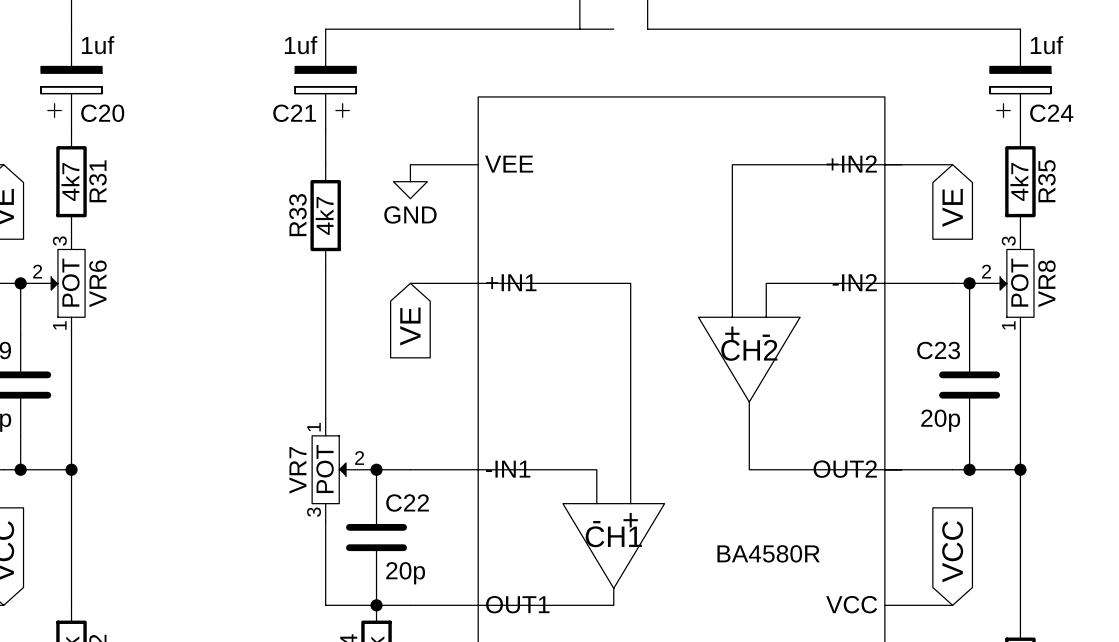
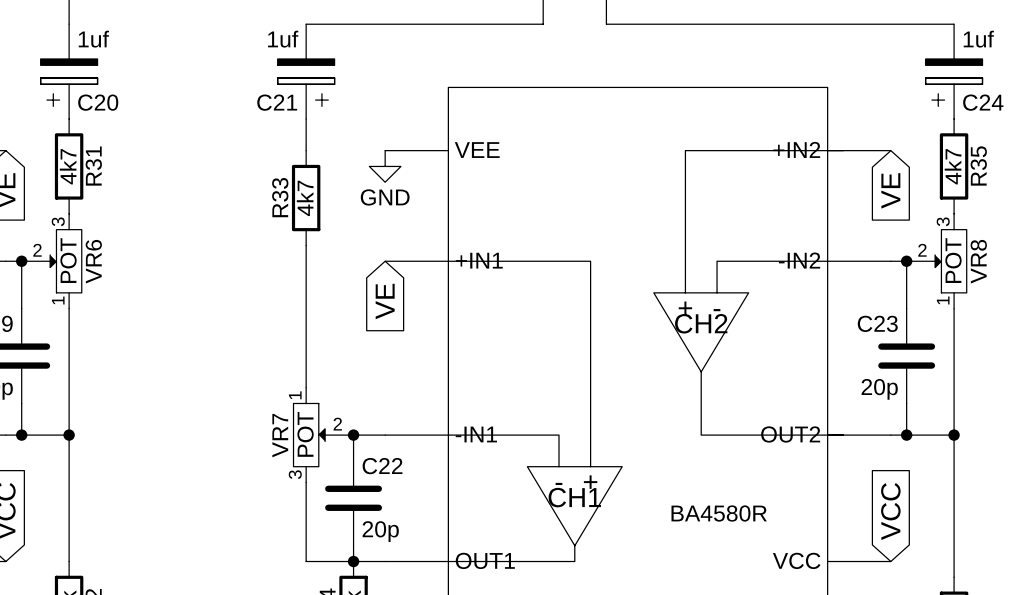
wire: (579, 29) (613, 29) -> none

